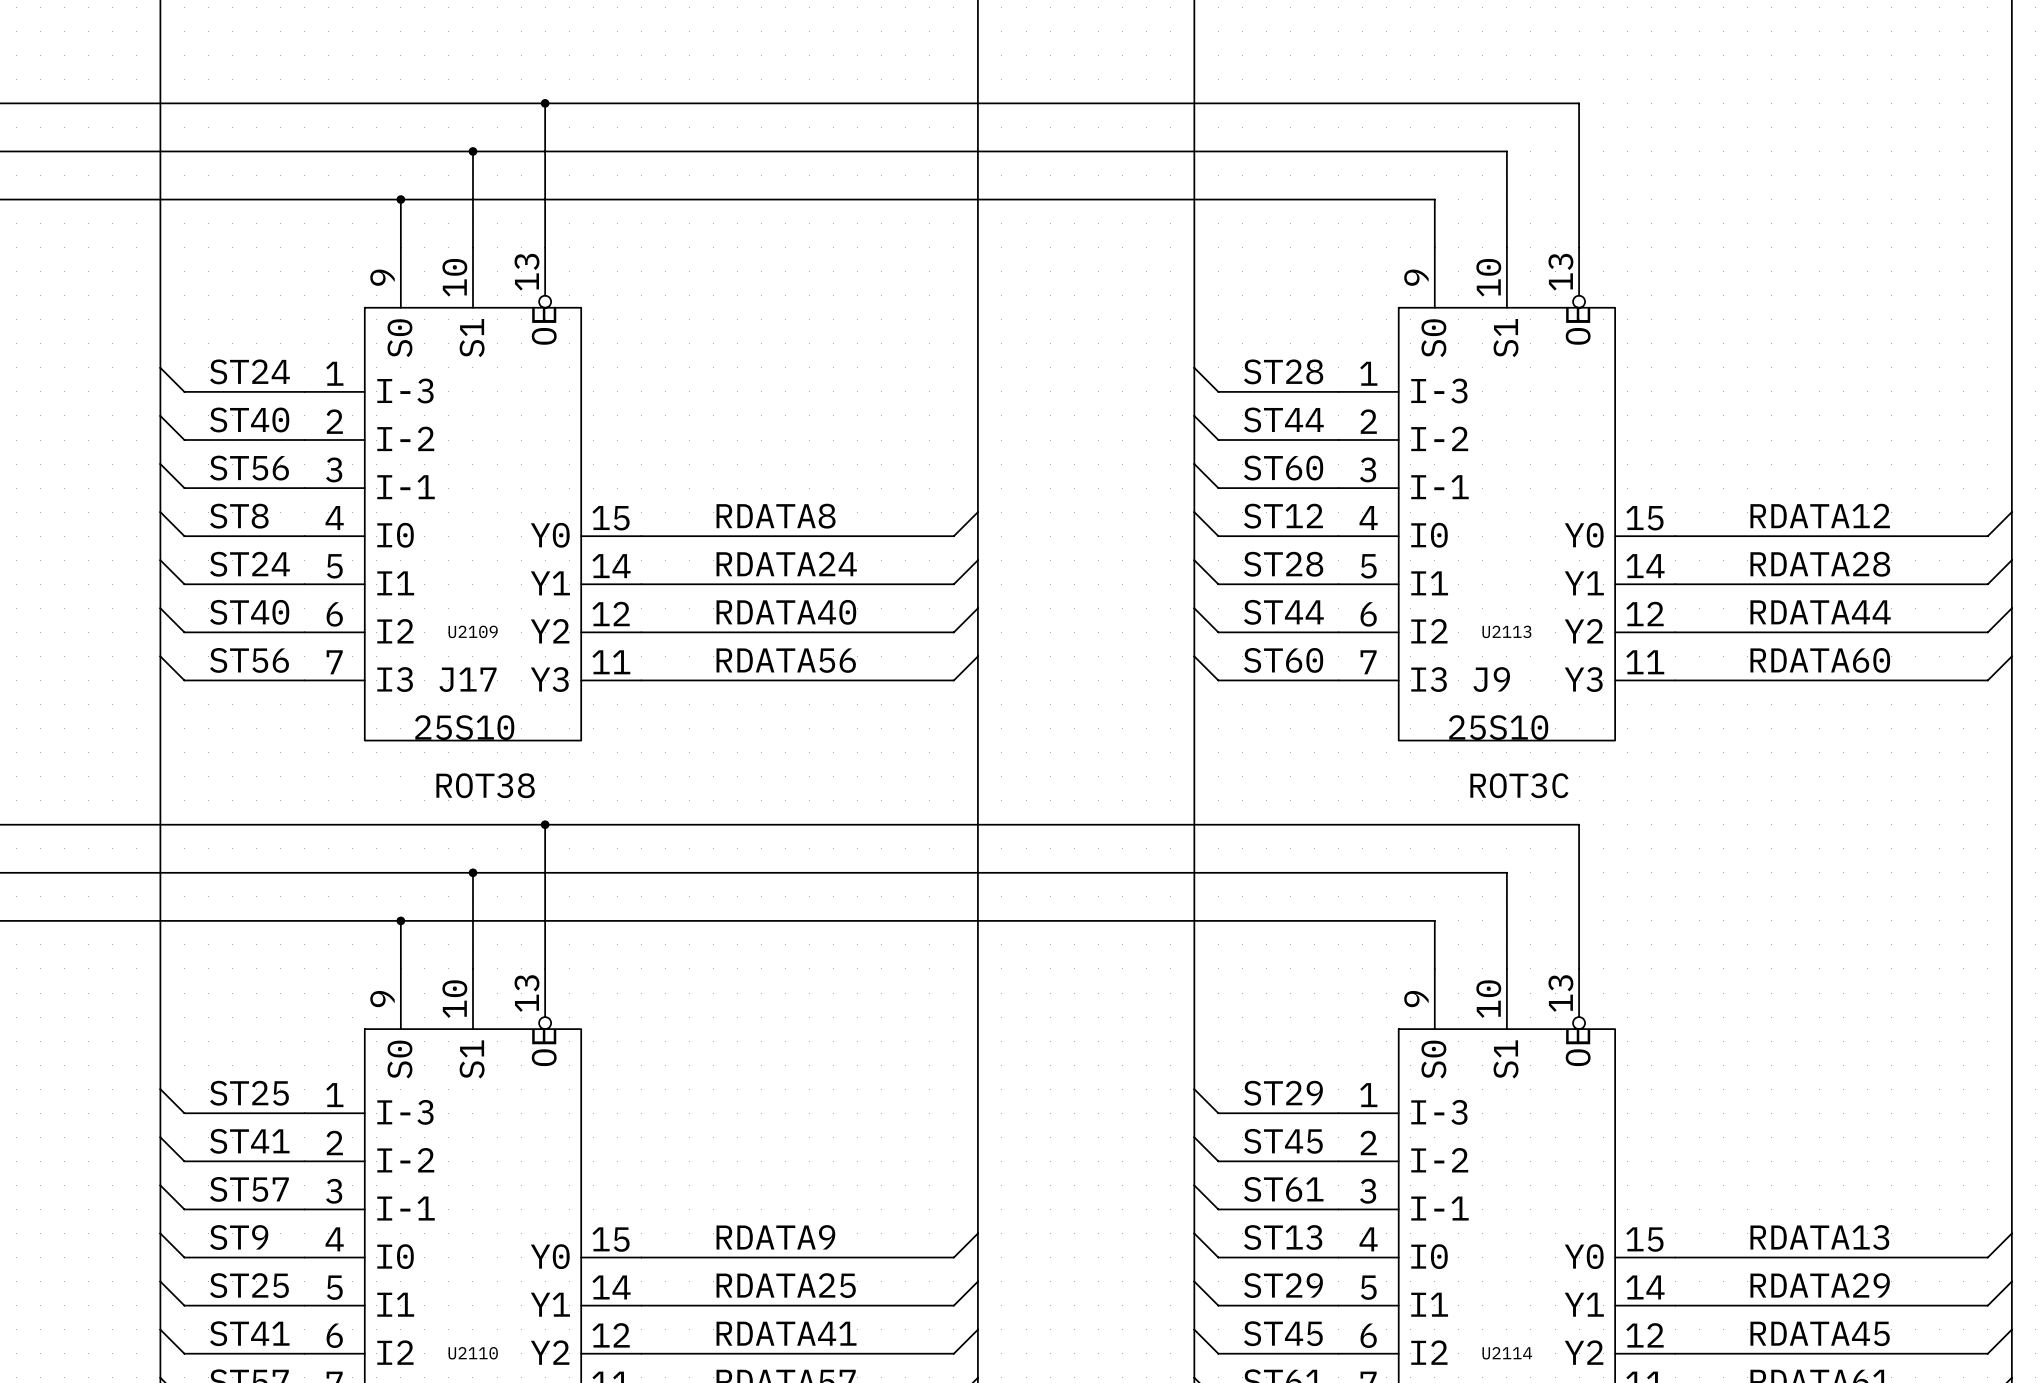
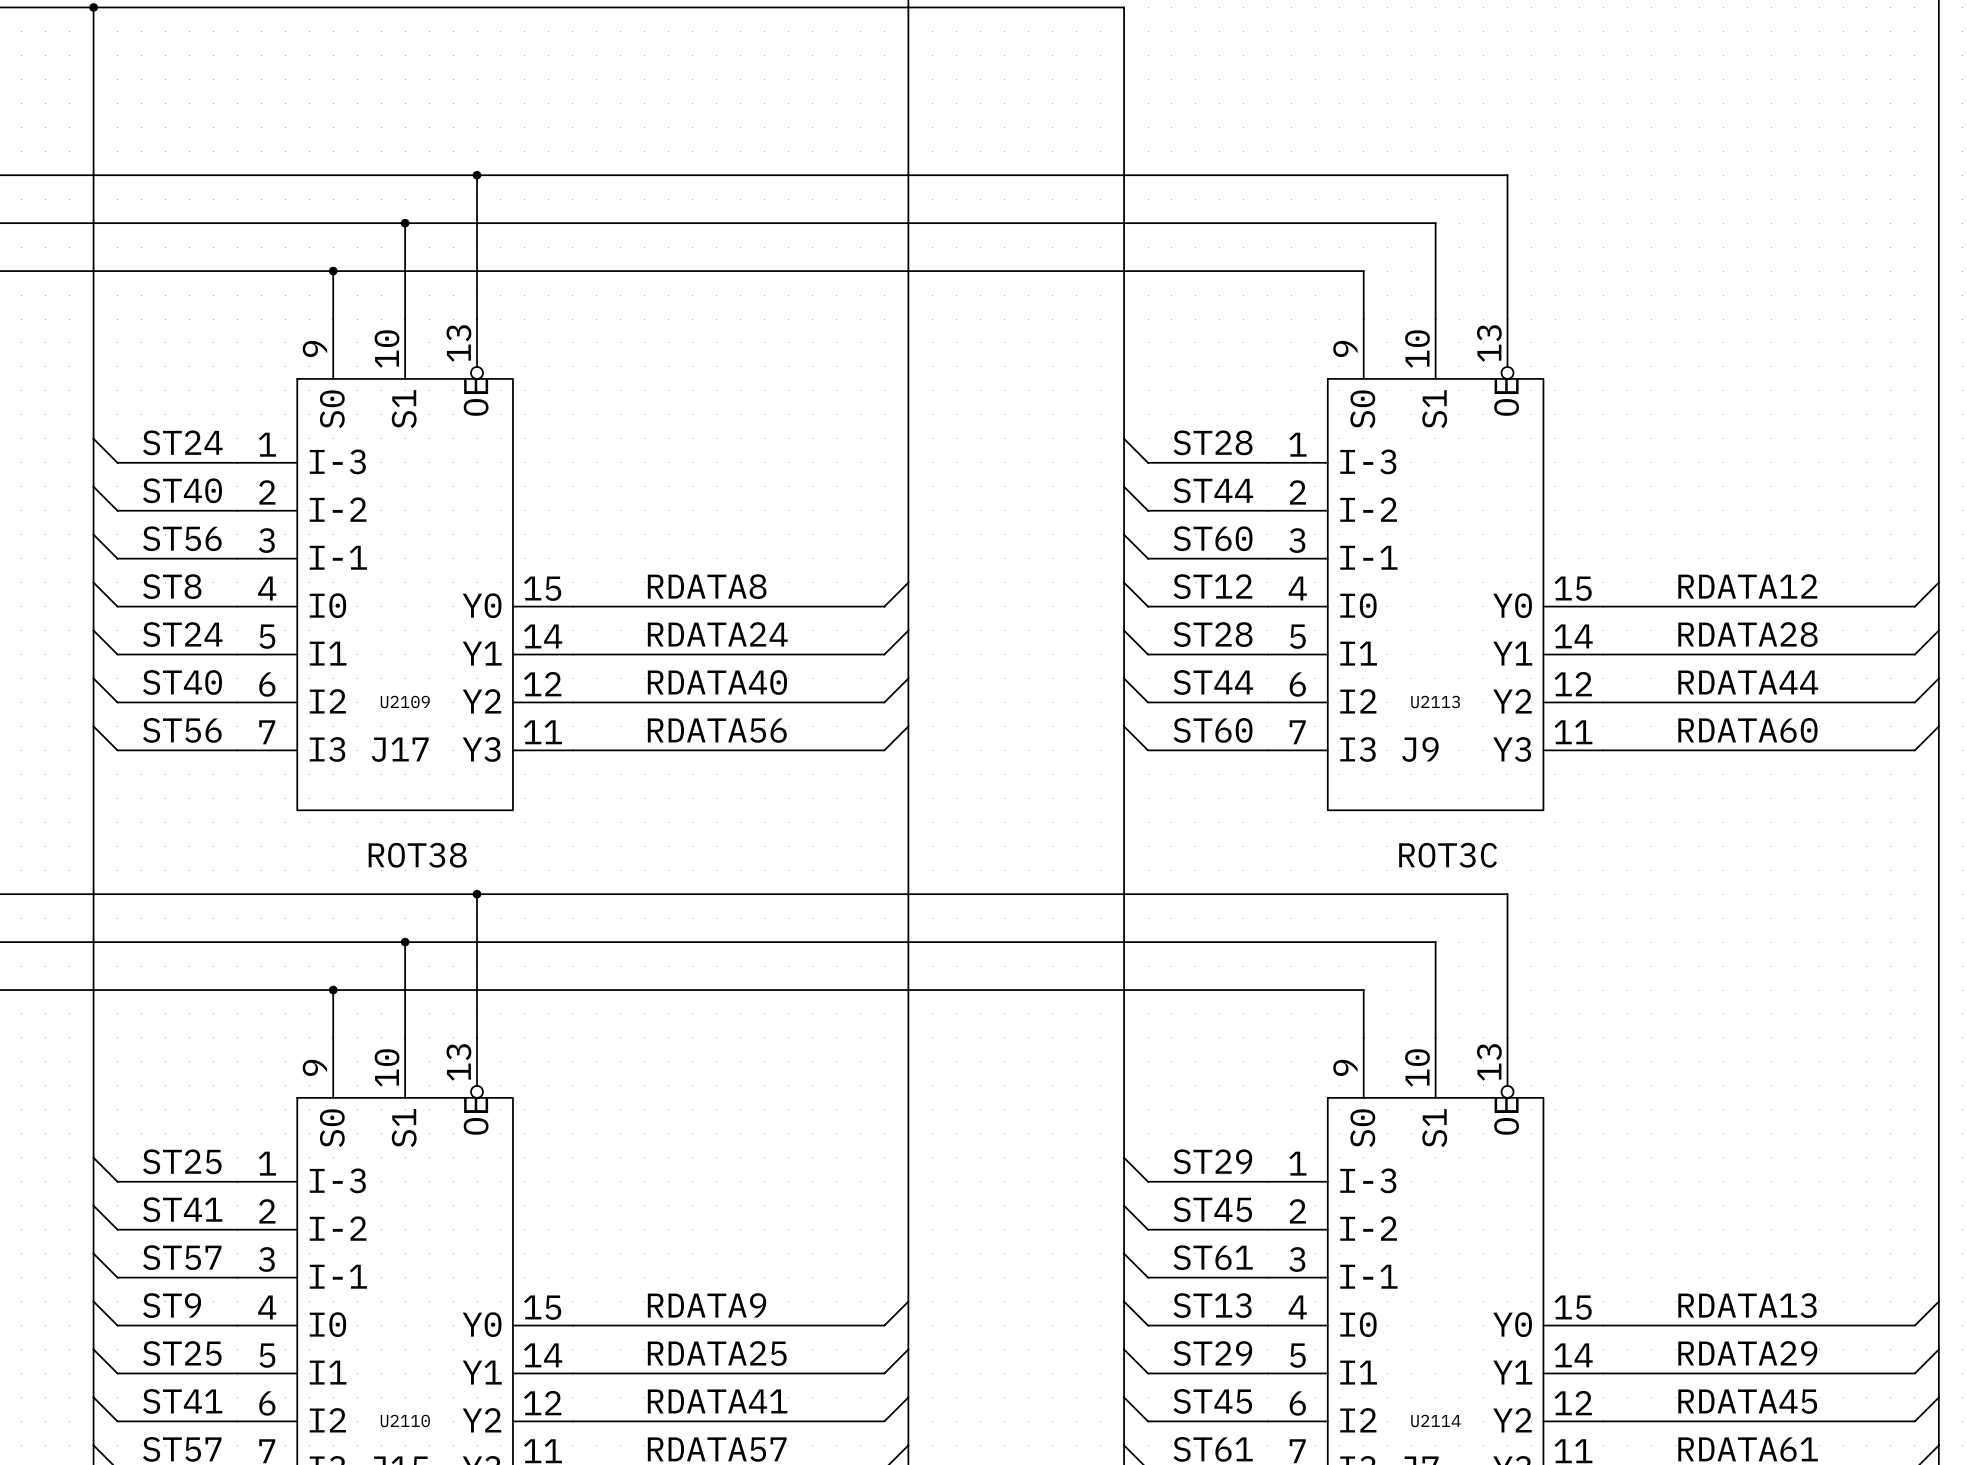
U2109 value: 25S10 (464, 727) -> none
U2113 value: 25S10 (1498, 727) -> none

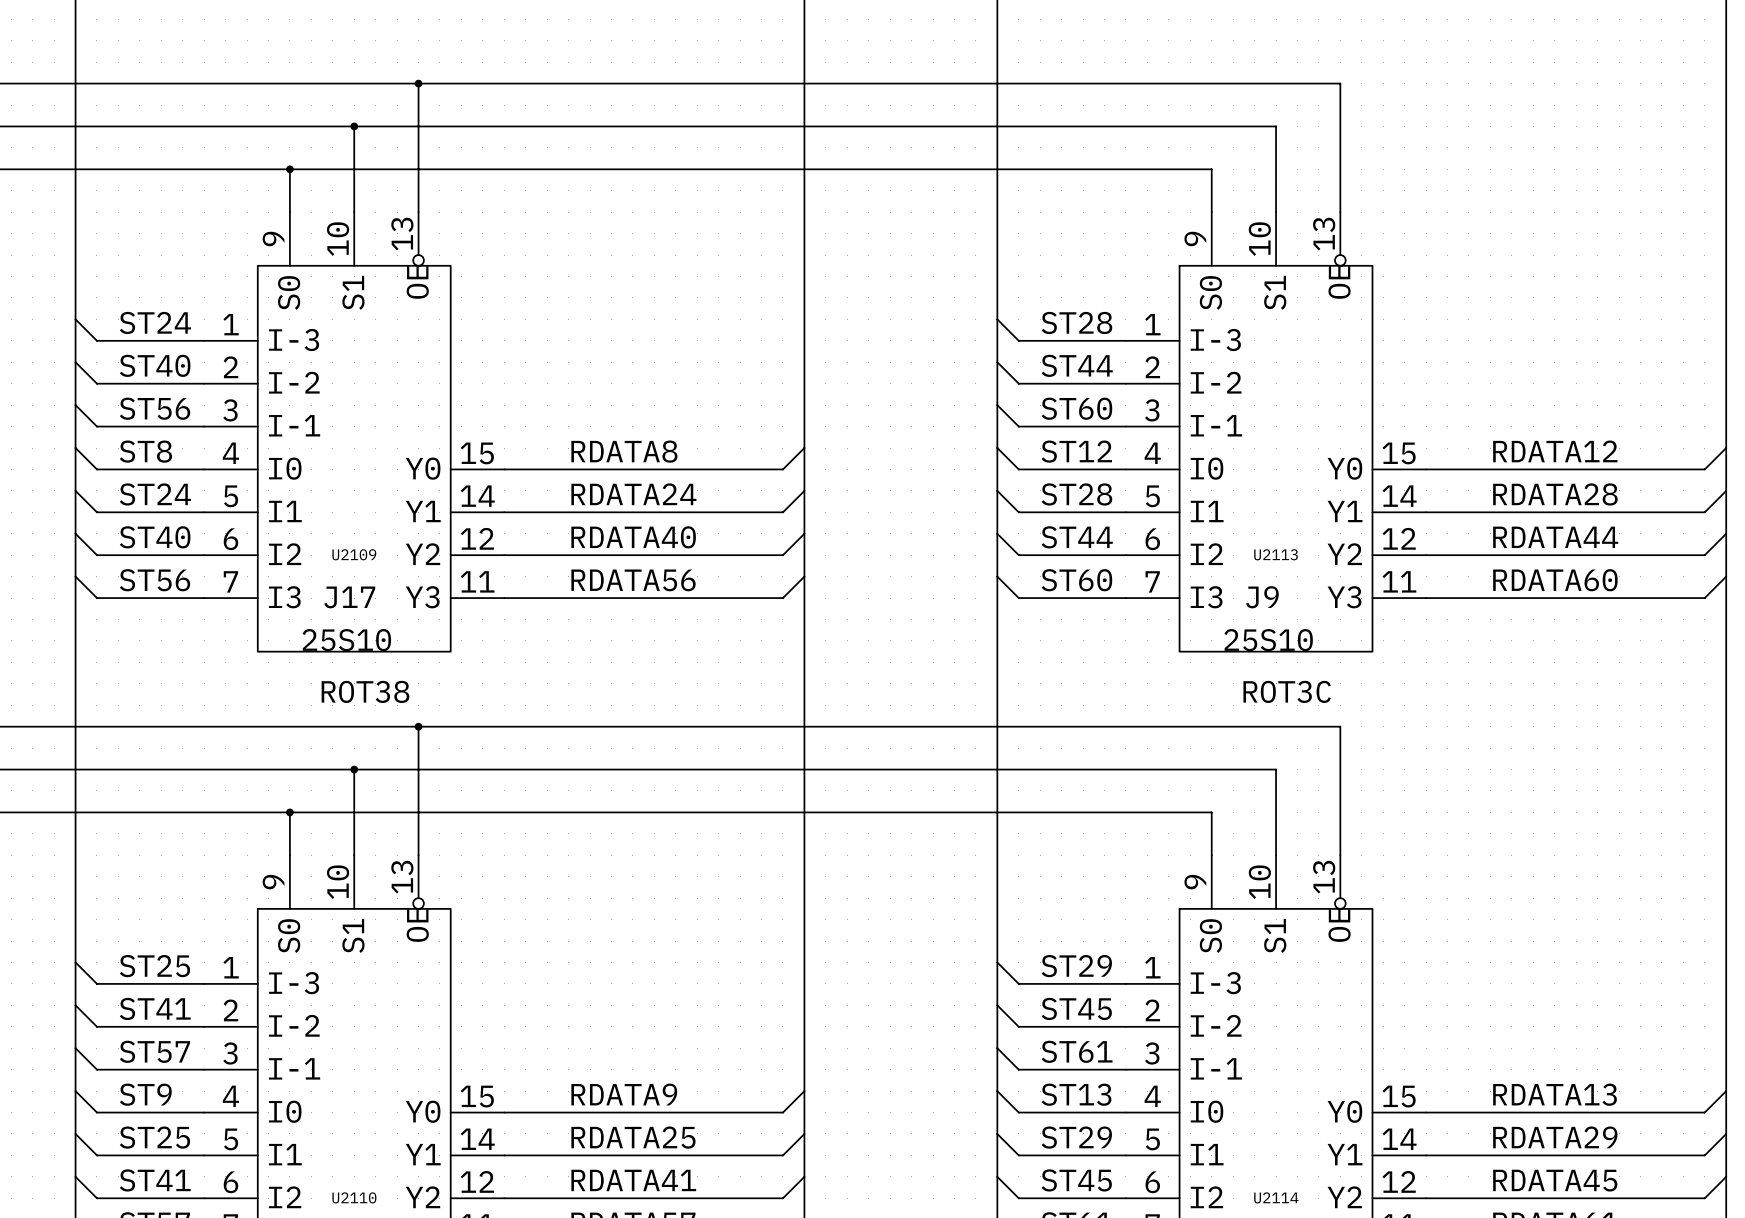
U2109 value: none -> 25S10 (346, 640)
U2113 value: none -> 25S10 (1268, 640)

